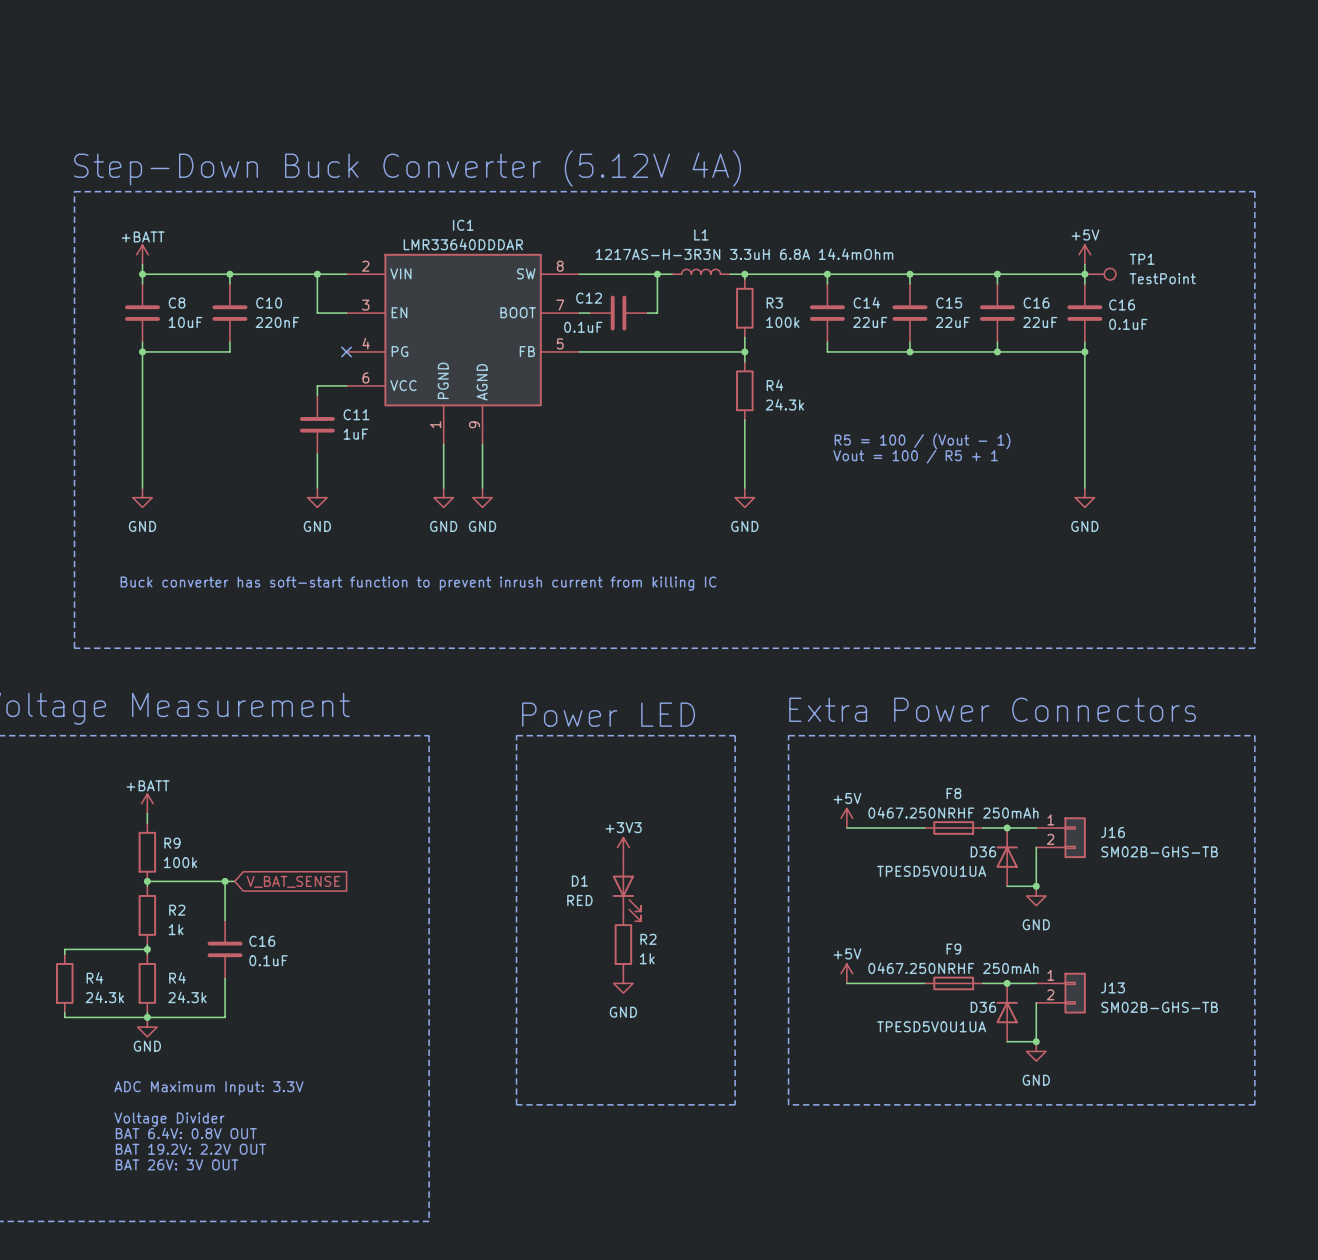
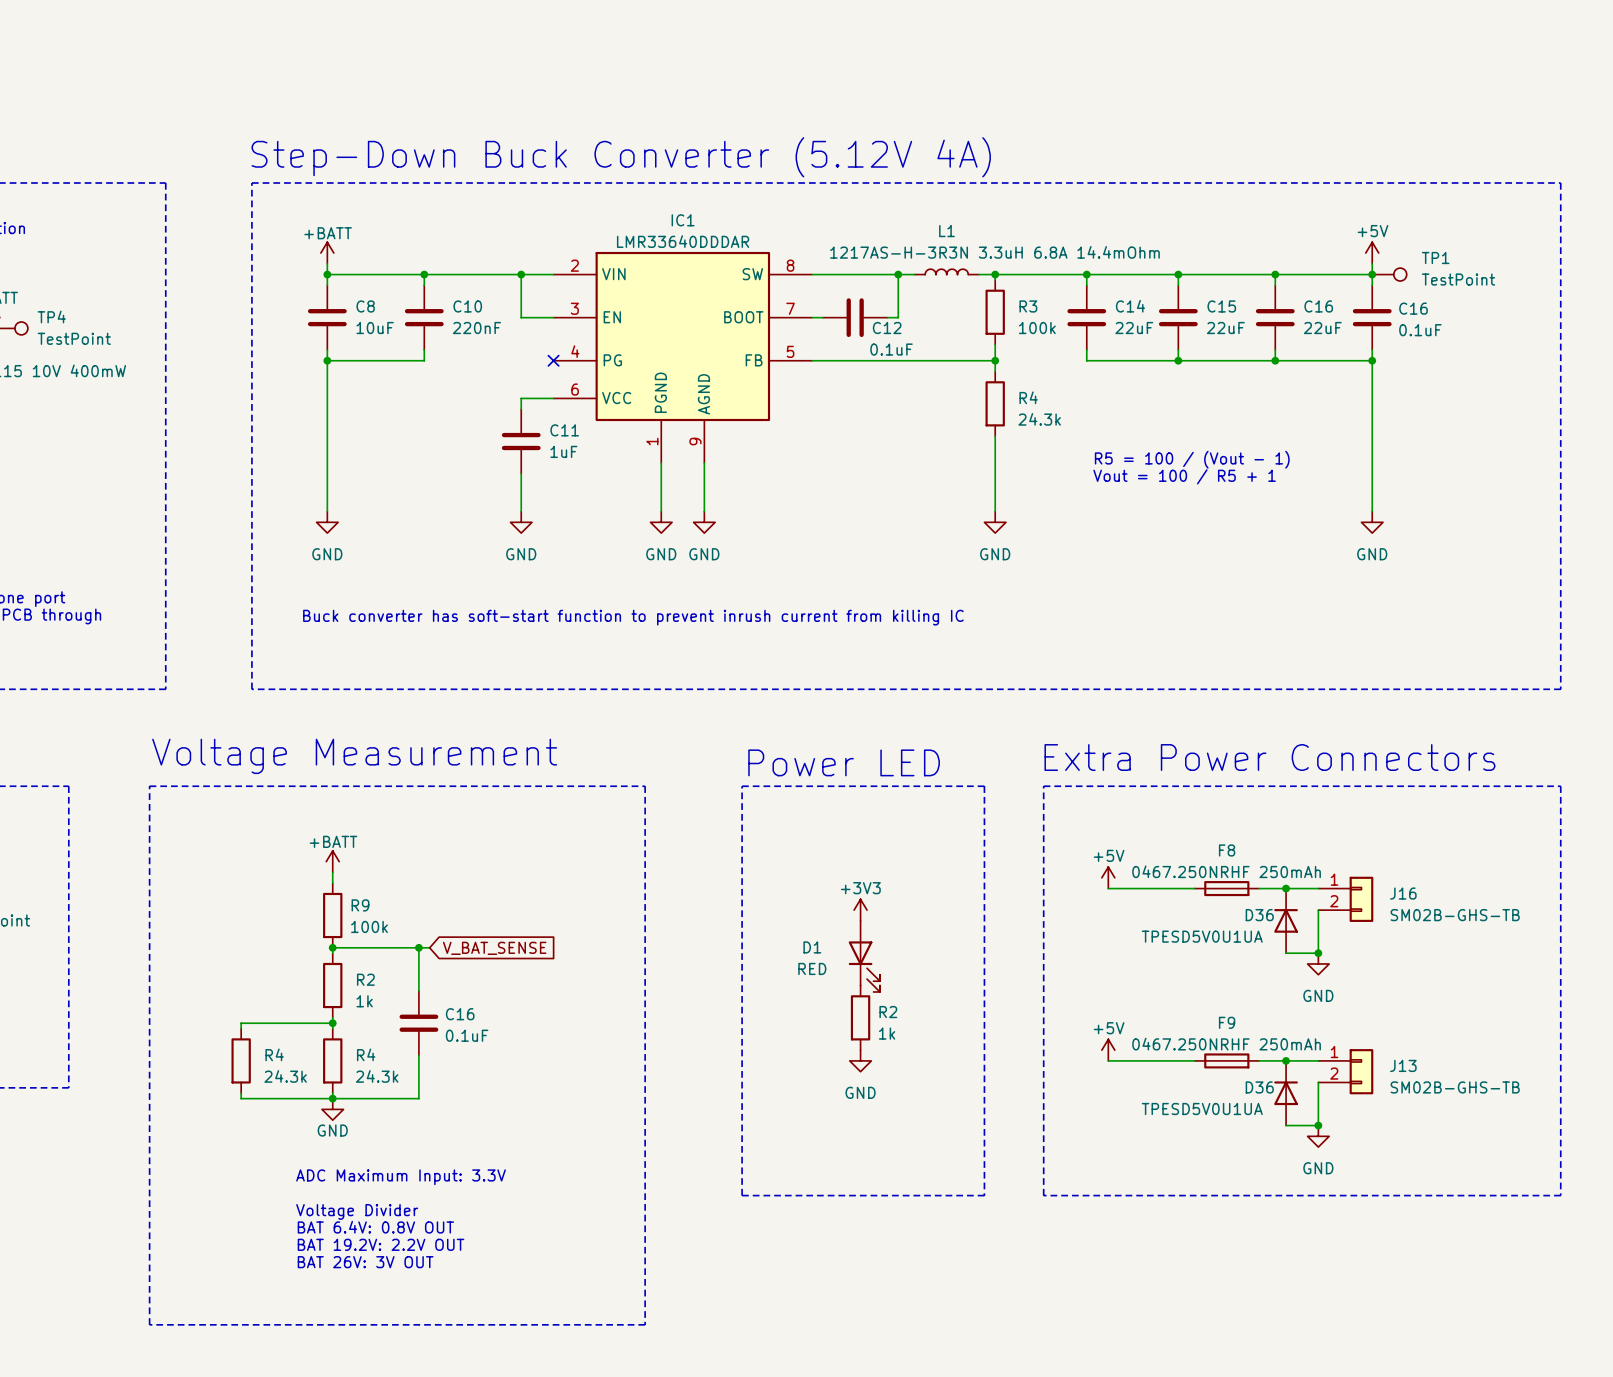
C12 name position: C12 (589, 298) -> C12 (887, 328)
C12 value position: 0.1uF (583, 327) -> 0.1uF (891, 349)

